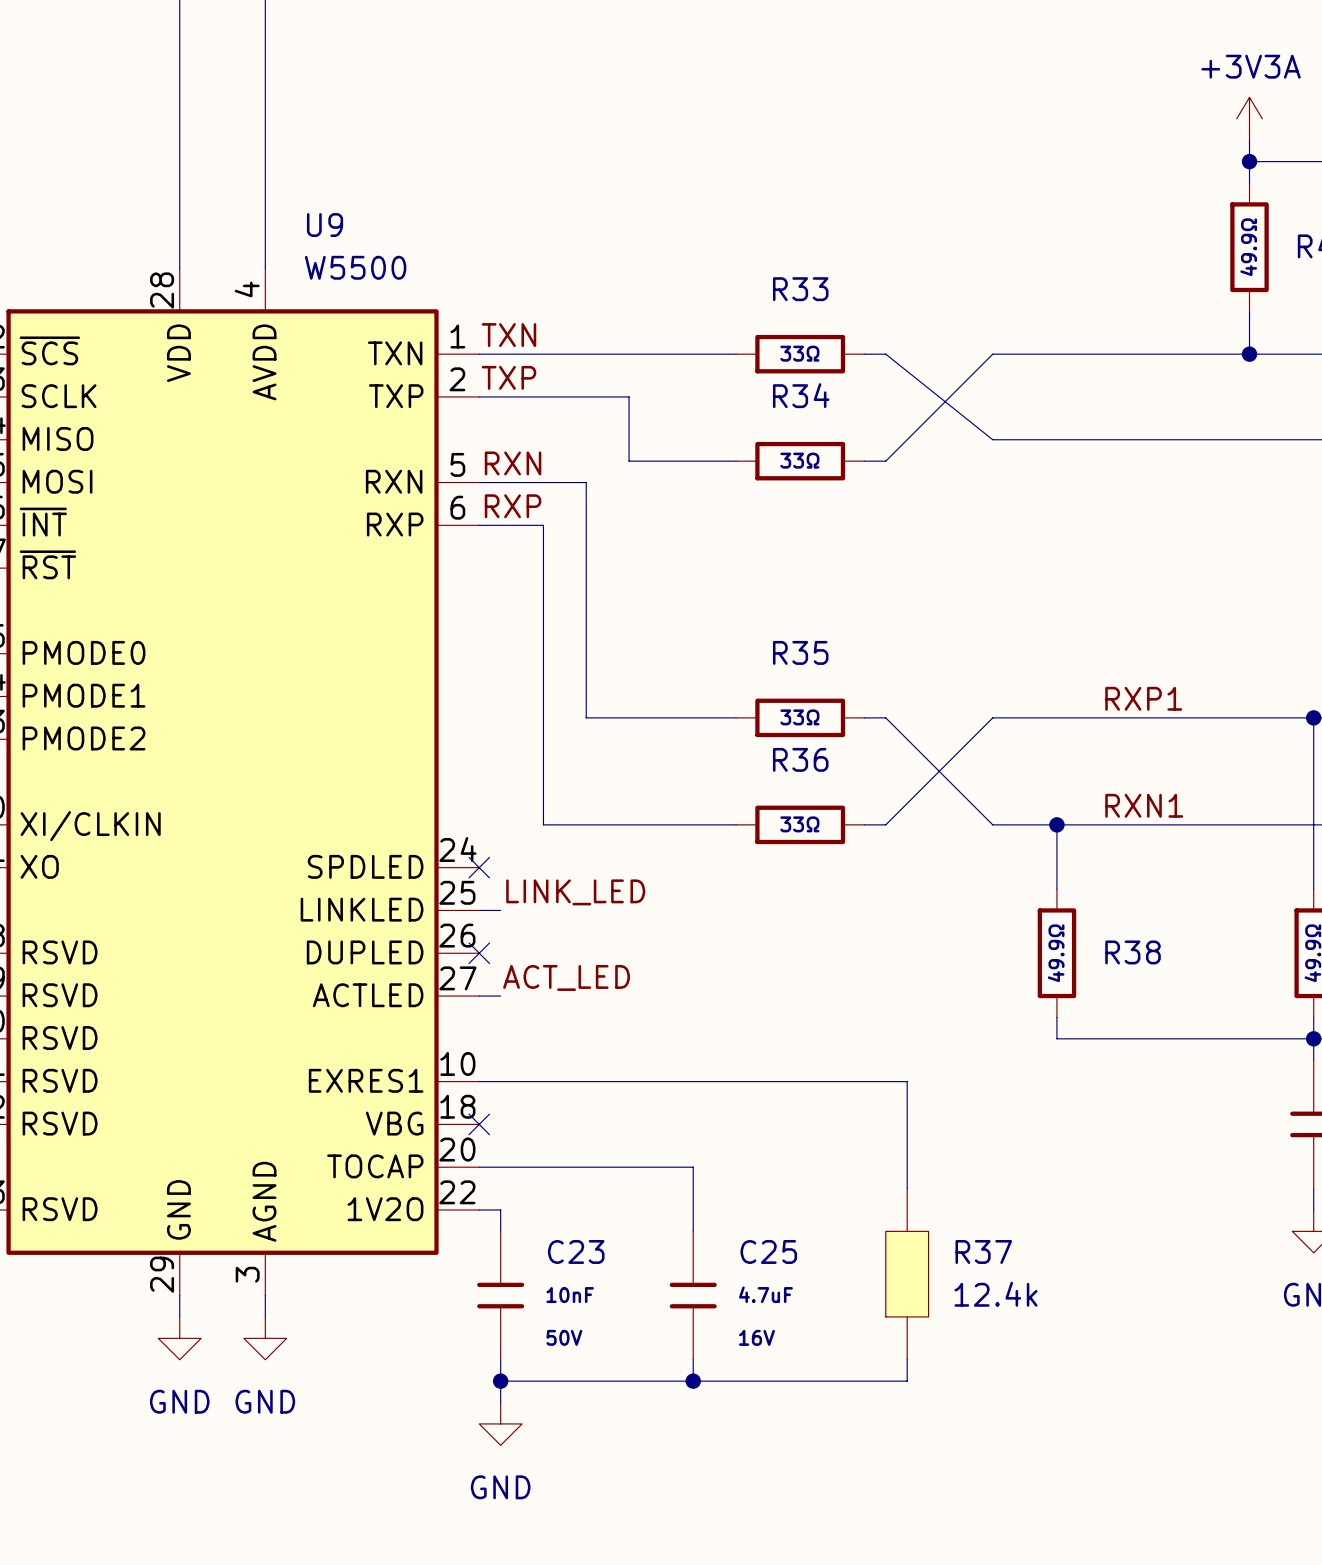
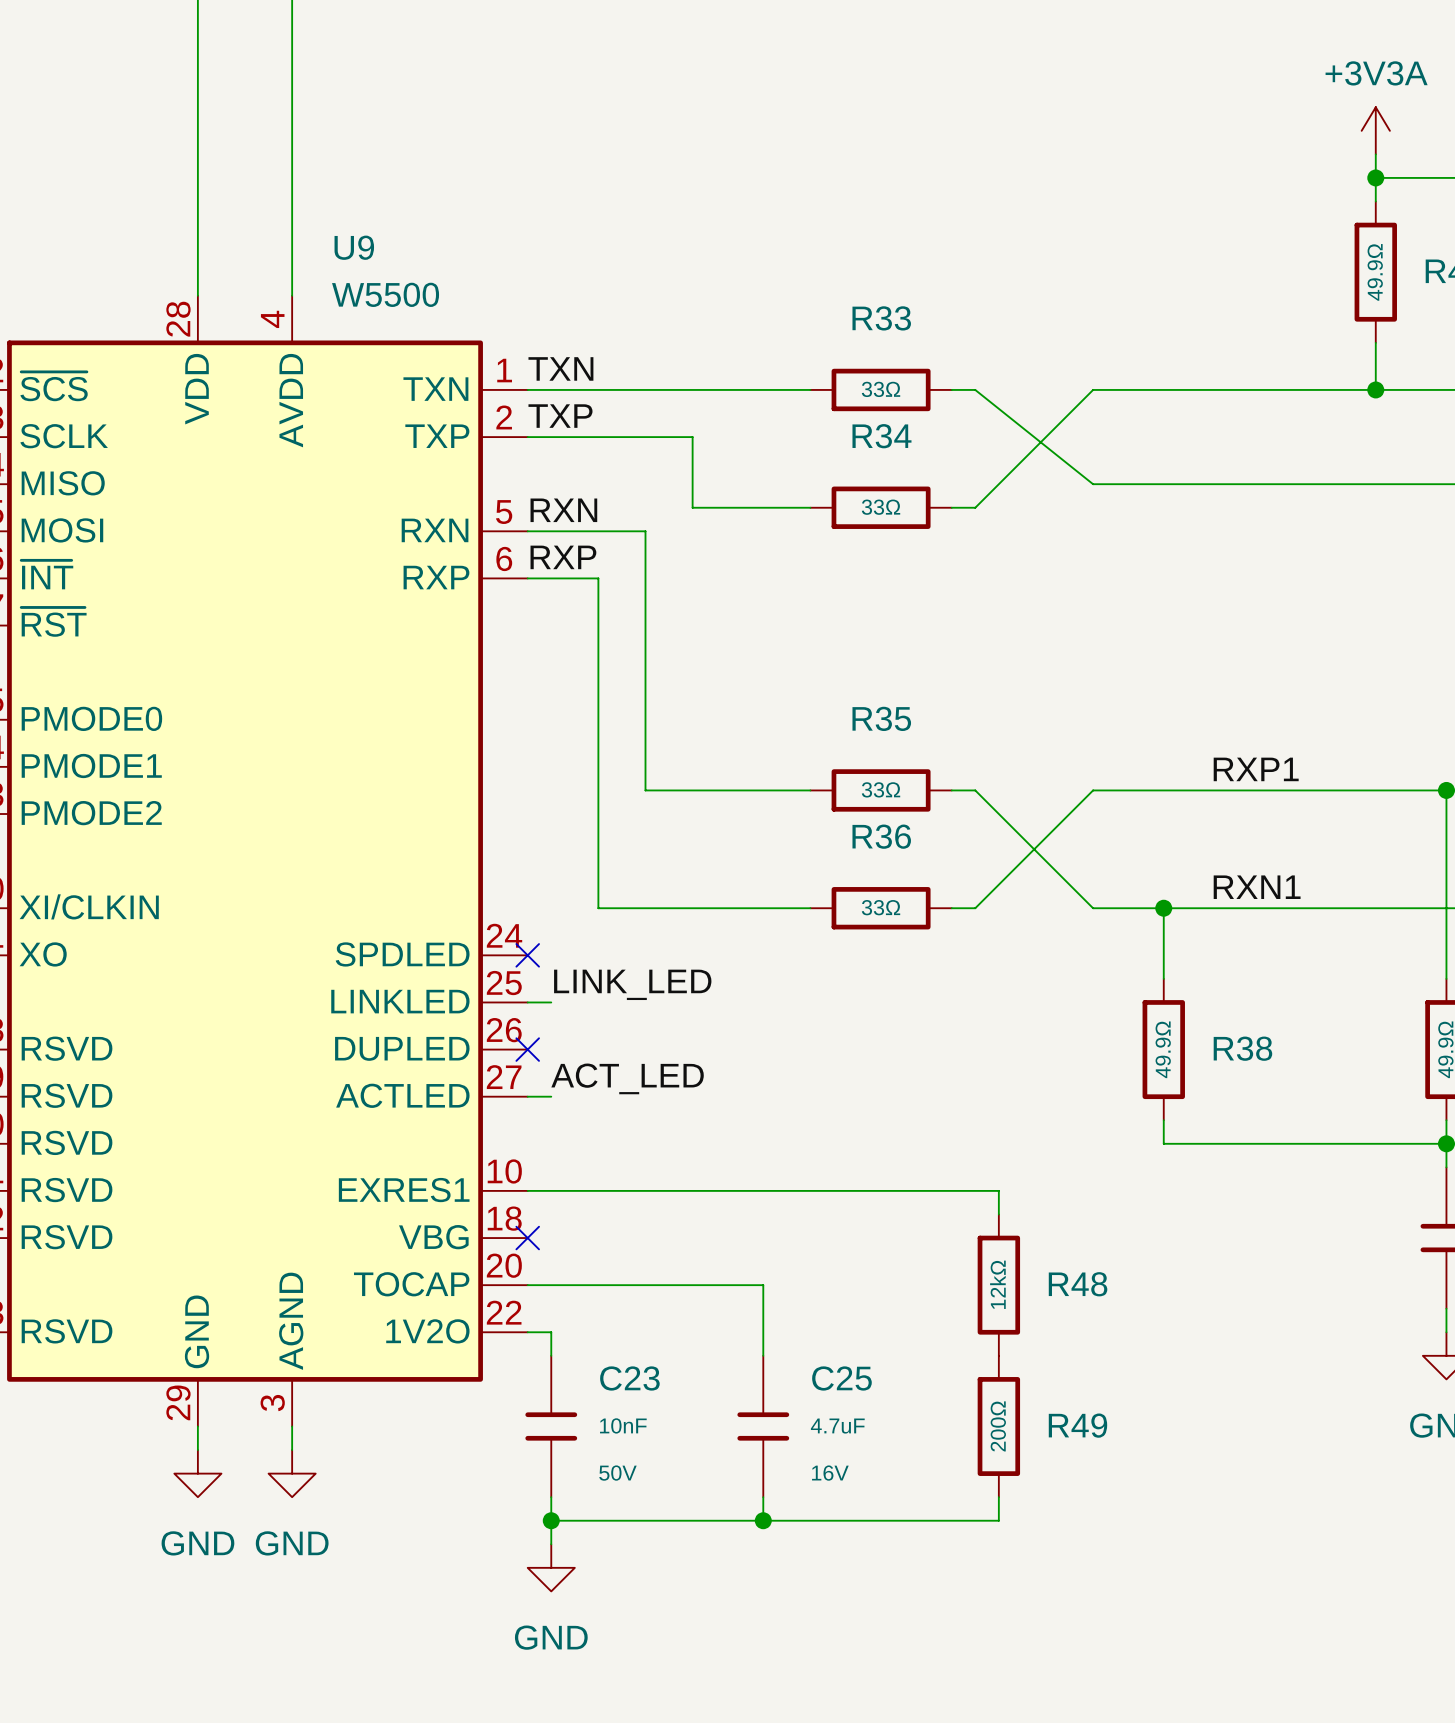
wire: (907, 1103) (907, 1188) -> none
R48: none -> 12kΩ (998, 1285)
R37: 12.4k (907, 1274) -> none
R49: none -> 200Ω (998, 1426)

